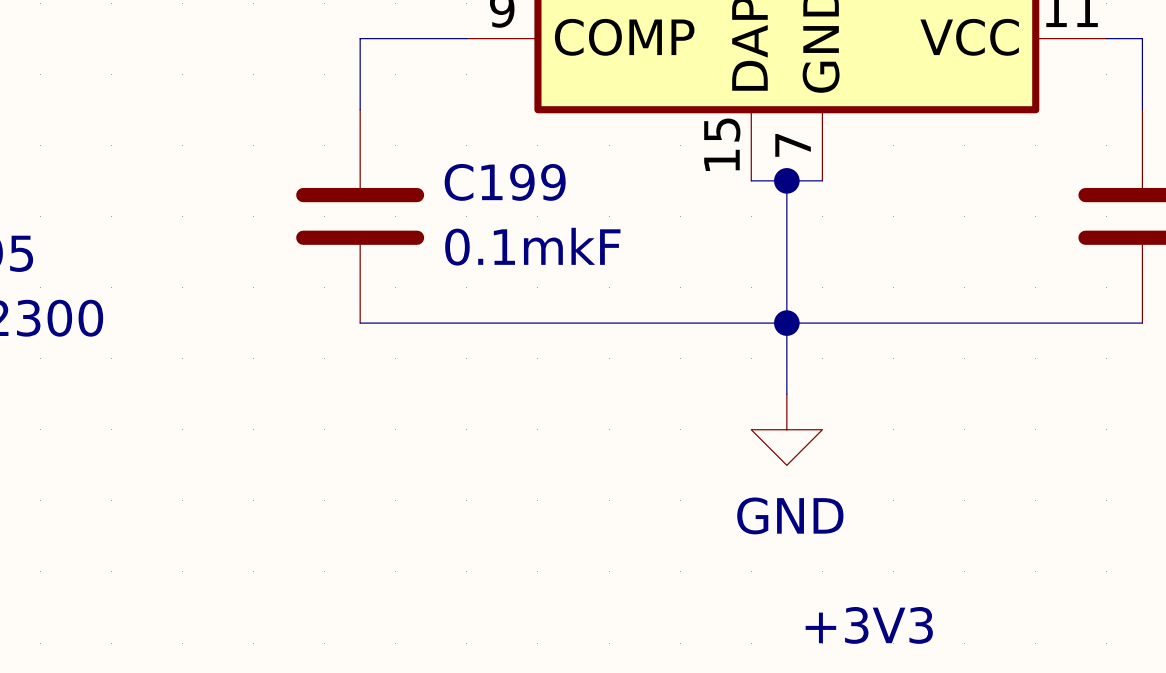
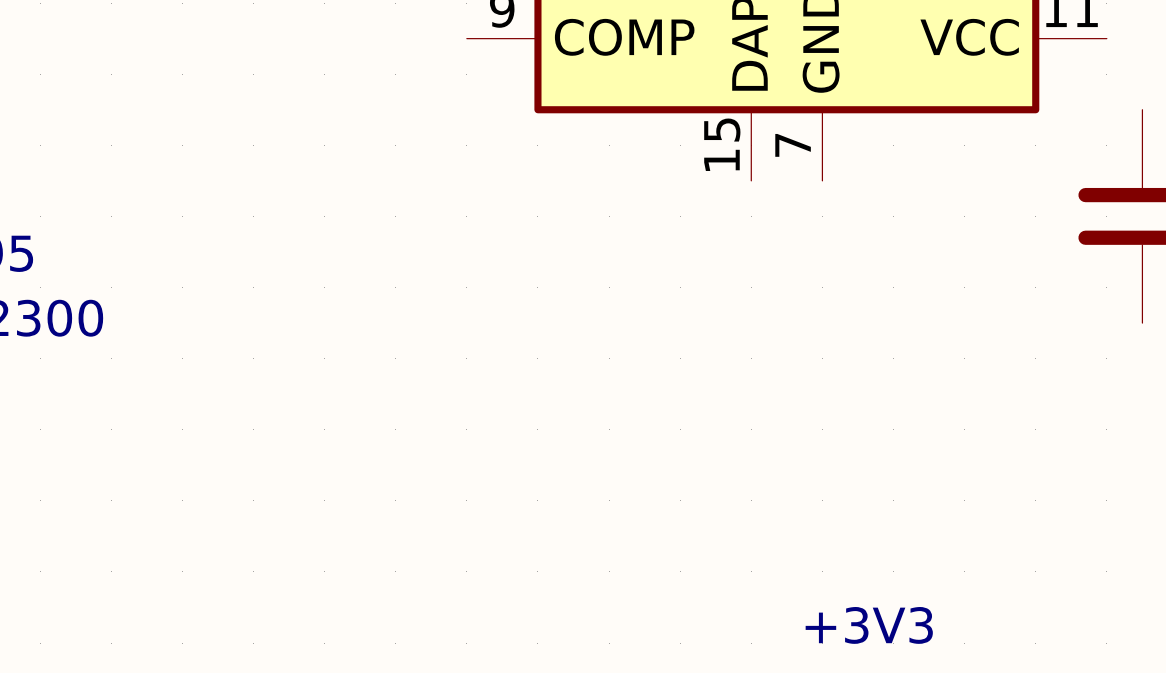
wire: (466, 38) (360, 38) (360, 109) -> none
wire: (1106, 38) (1142, 38) (1142, 109) -> none
wire: (751, 180) (822, 180) -> none
wire: (786, 180) (786, 394) -> none
junction: (786, 180) -> none
C199: 0.1mkF (360, 216) -> none
wire: (360, 323) (1142, 323) -> none
junction: (786, 323) -> none
power symbol: GND (786, 429) -> none

